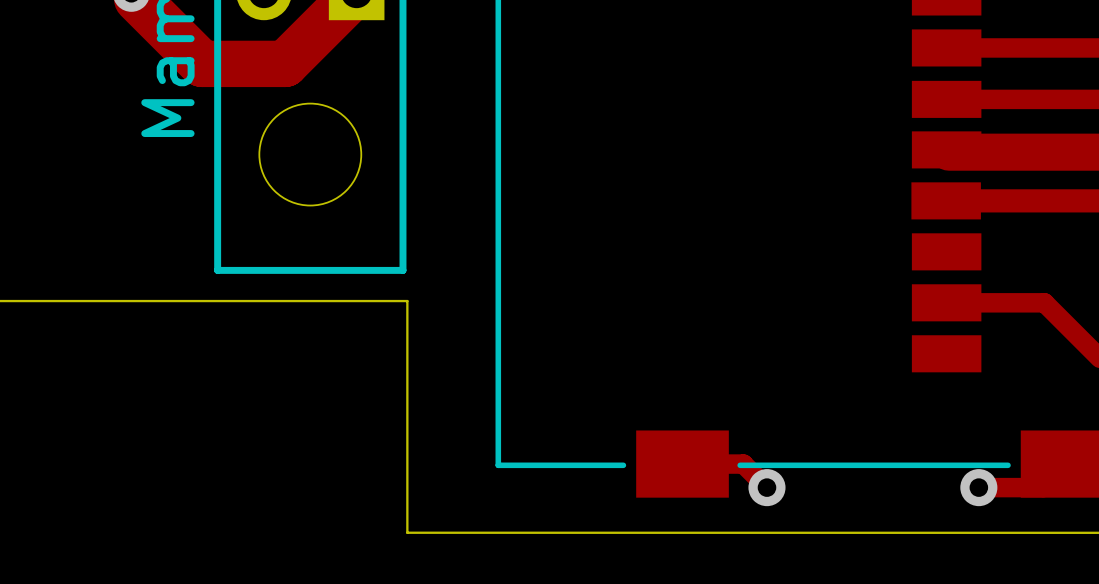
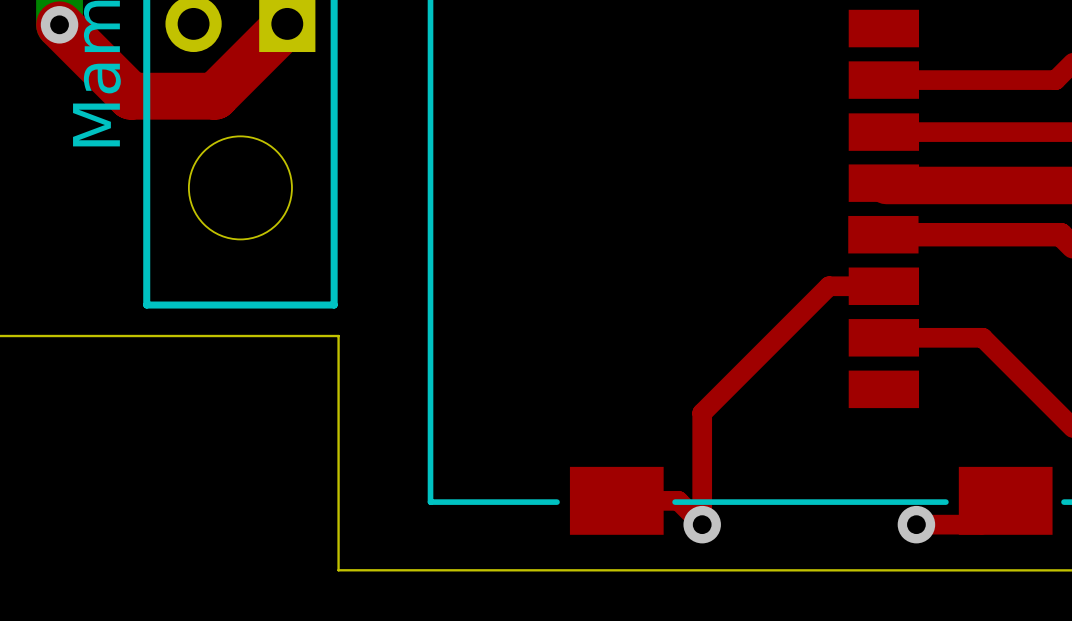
top track: none -> (883, 286) (829, 286) (702, 413) (702, 524)

